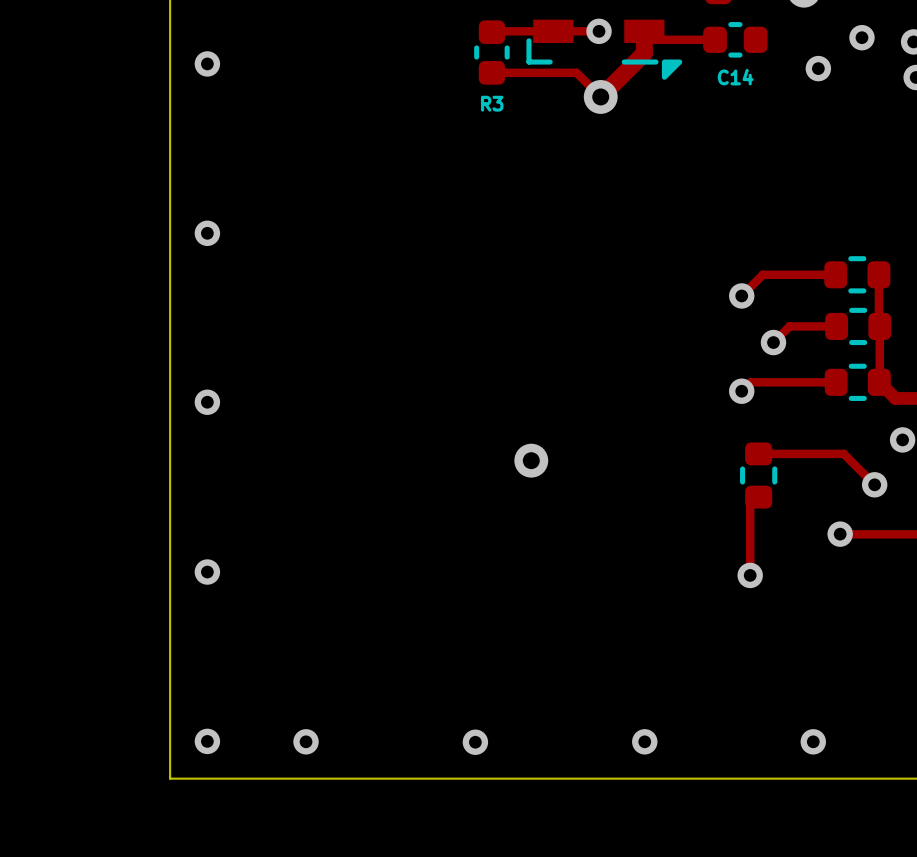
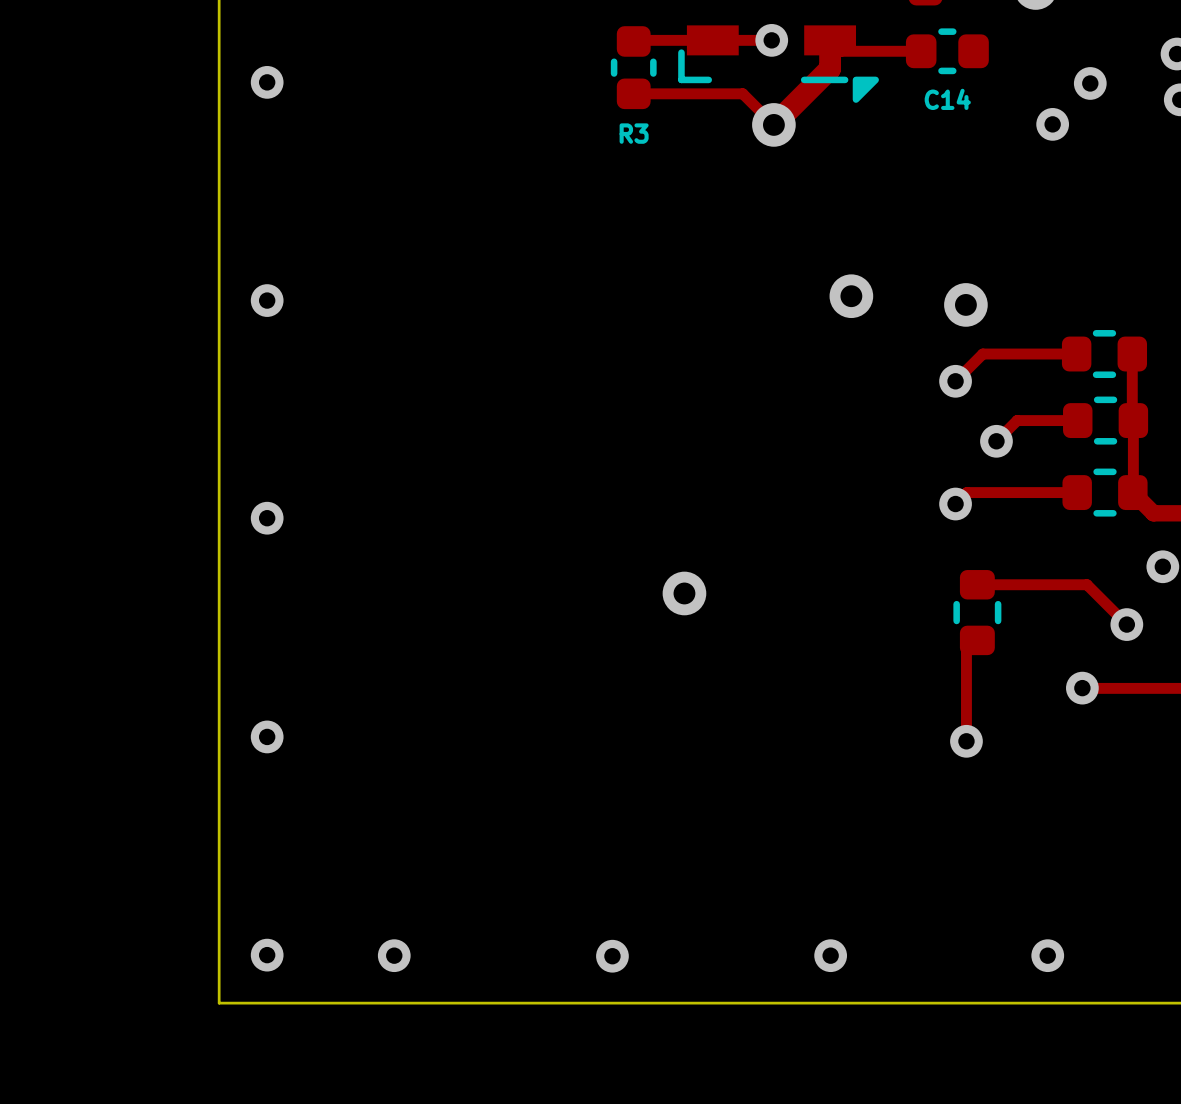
via: (861, 37) -> none
via: none -> (1090, 83)
via: (818, 68) -> none
via: none -> (1052, 124)
via: none -> (851, 296)
via: none -> (965, 304)

